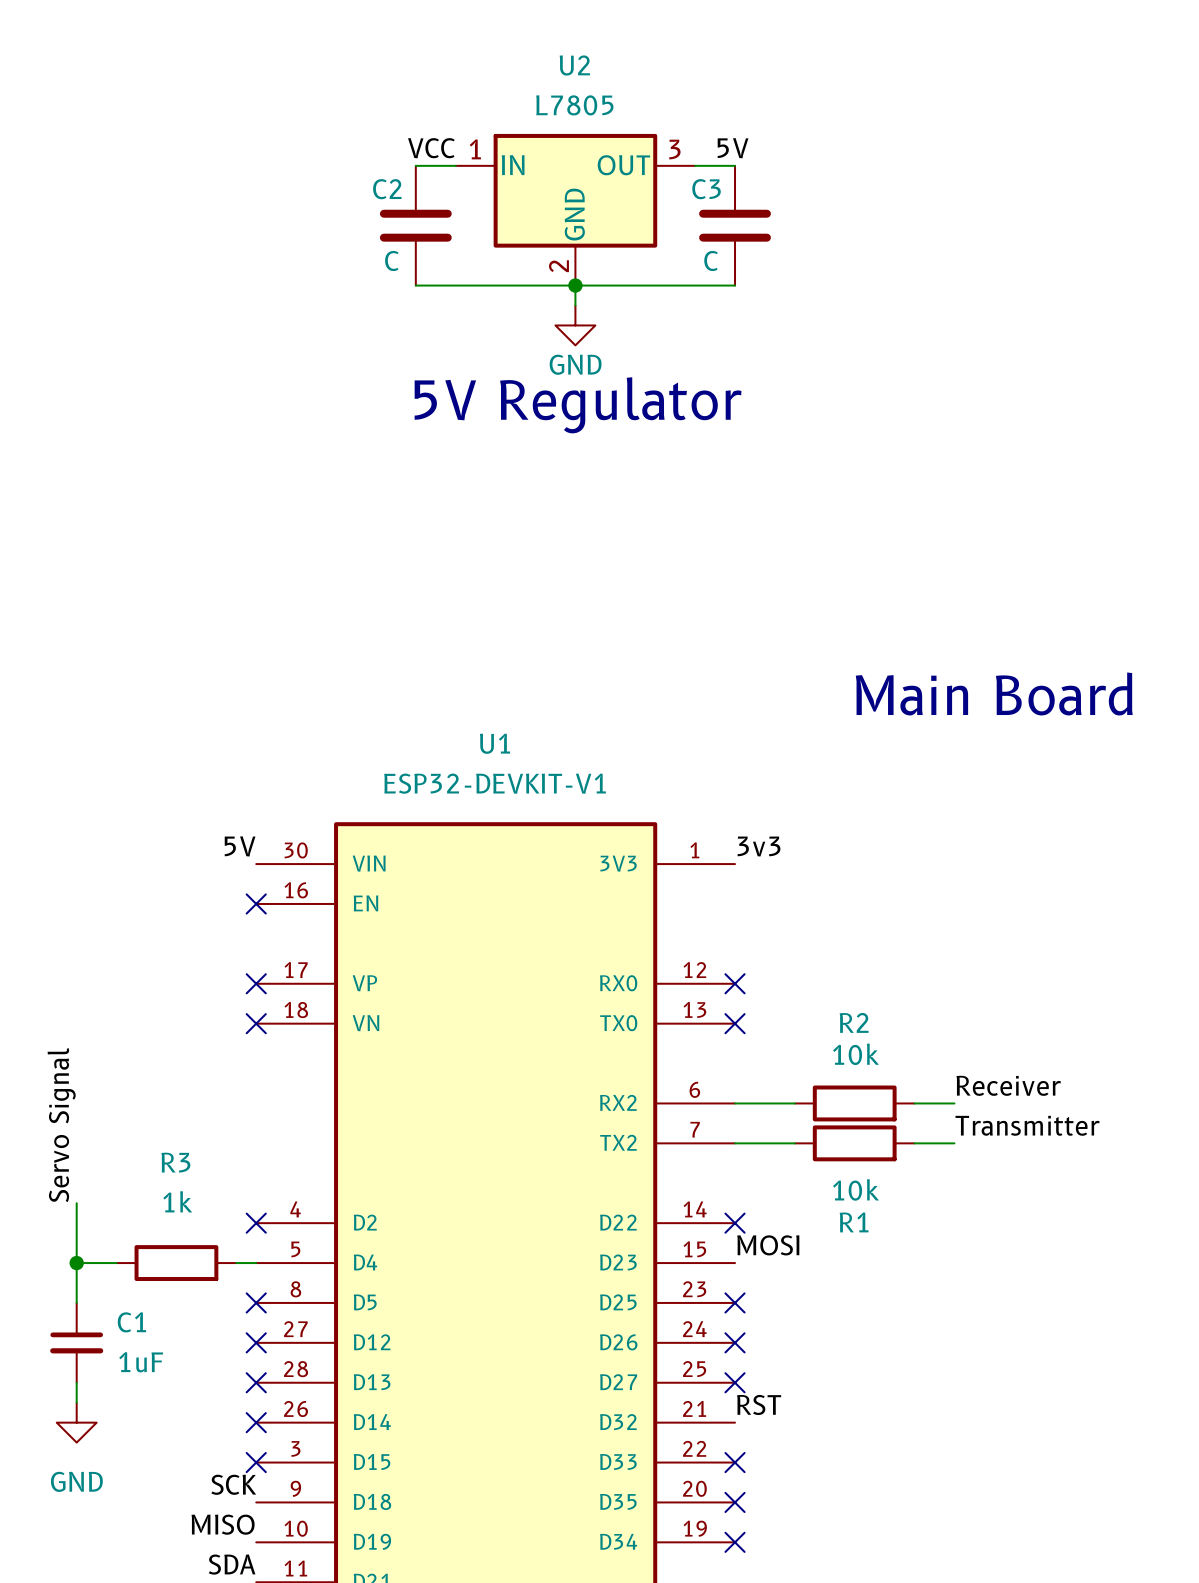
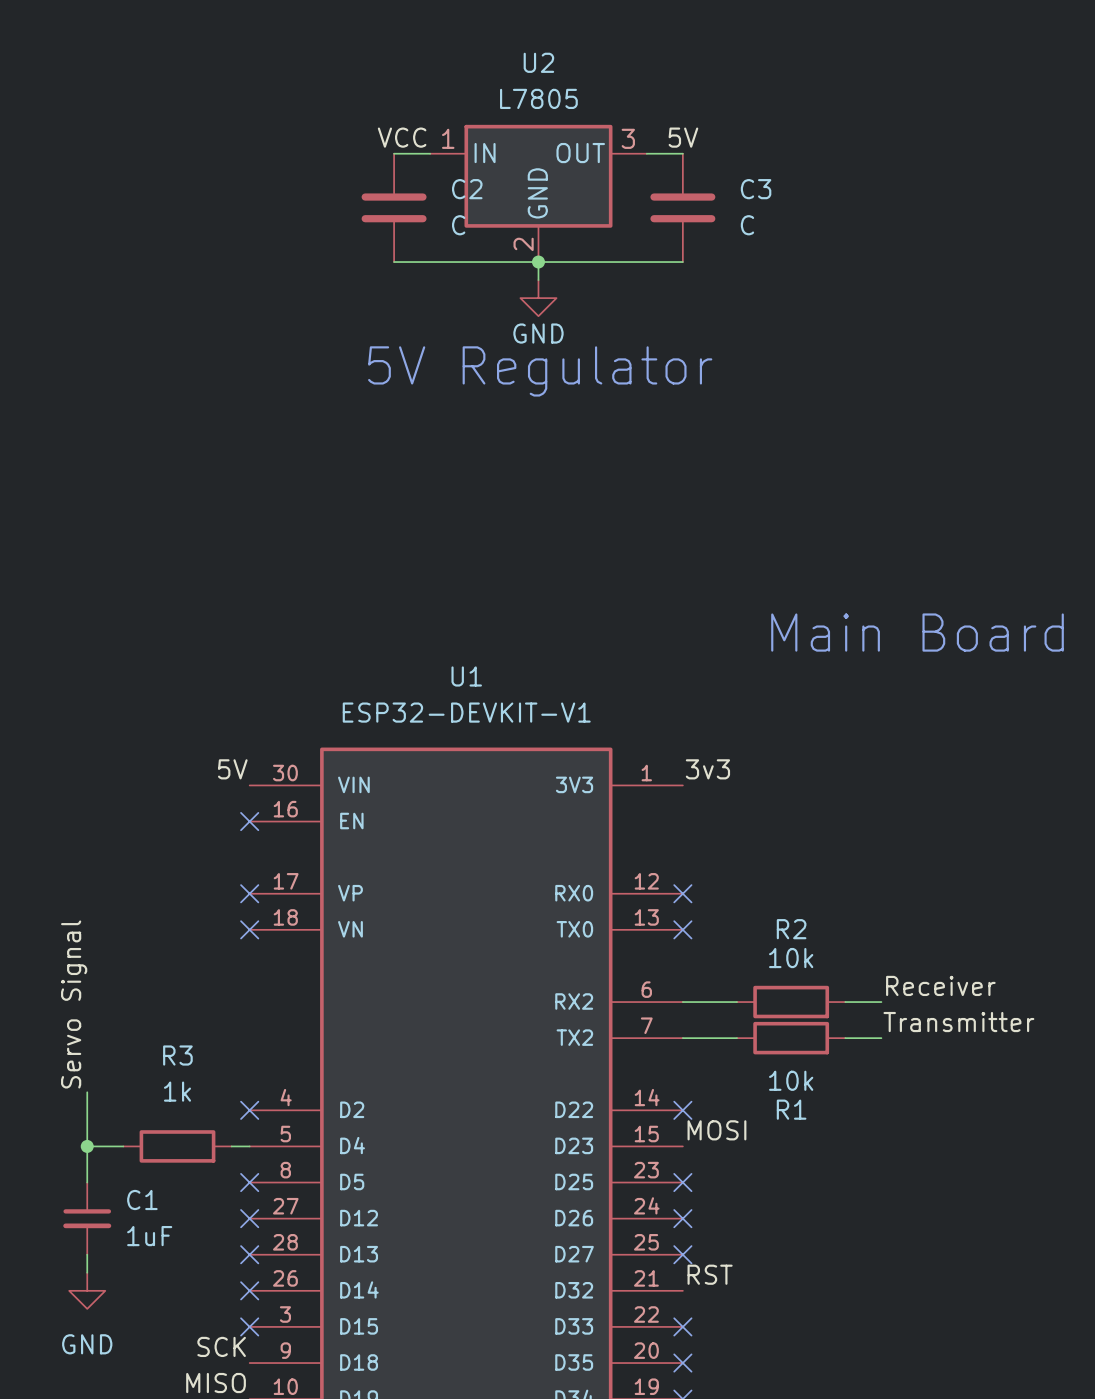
C2 name position: C2 (387, 189) -> C2 (467, 189)
C3 name position: C3 (706, 189) -> C3 (756, 189)
C2 value position: C (391, 260) -> C (458, 225)
C3 value position: C (711, 260) -> C (747, 225)

